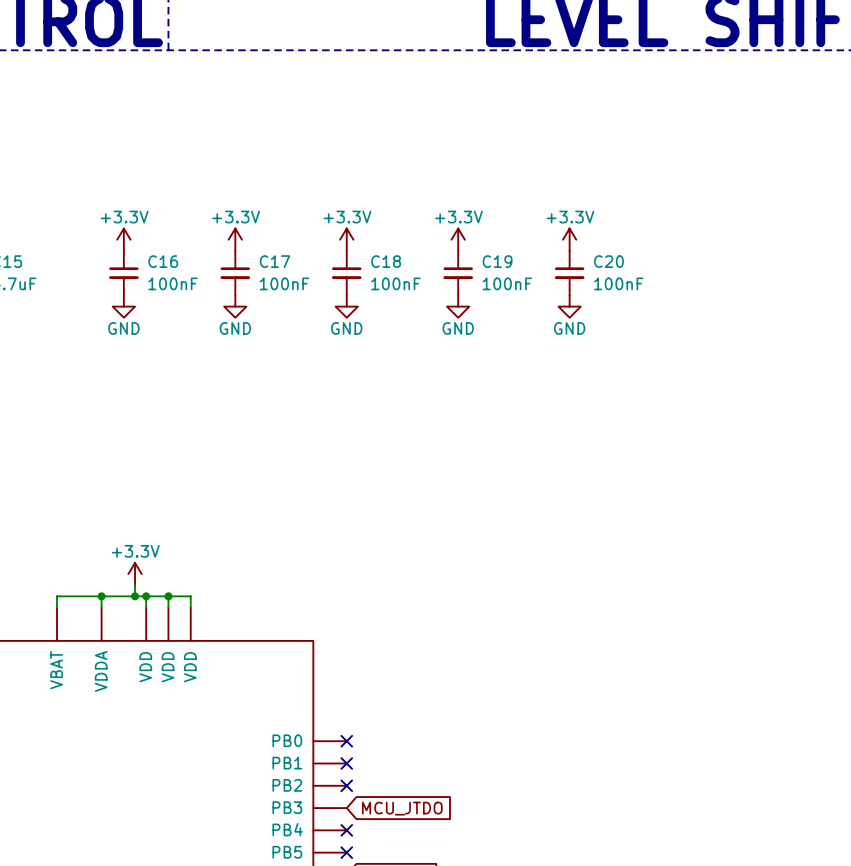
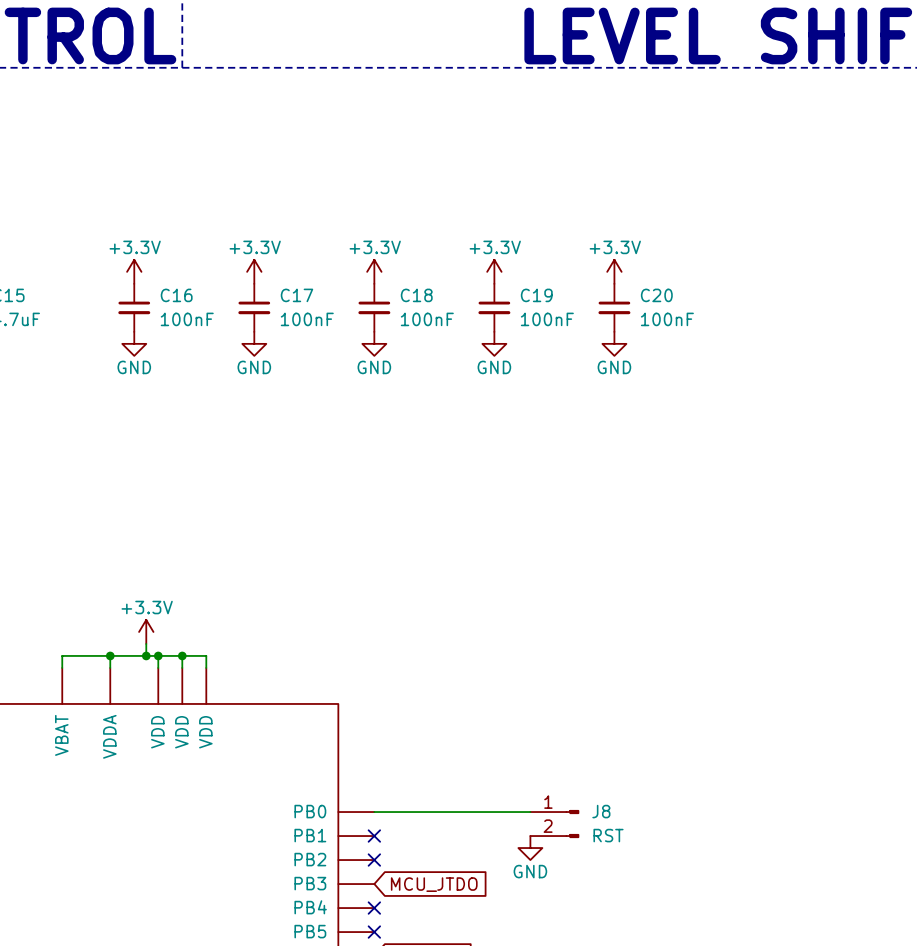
wire: none -> (374, 812) (530, 812)
no-connect mark: (346, 741) -> none
J8: none -> RST (554, 824)
power symbol: none -> GND (530, 848)

